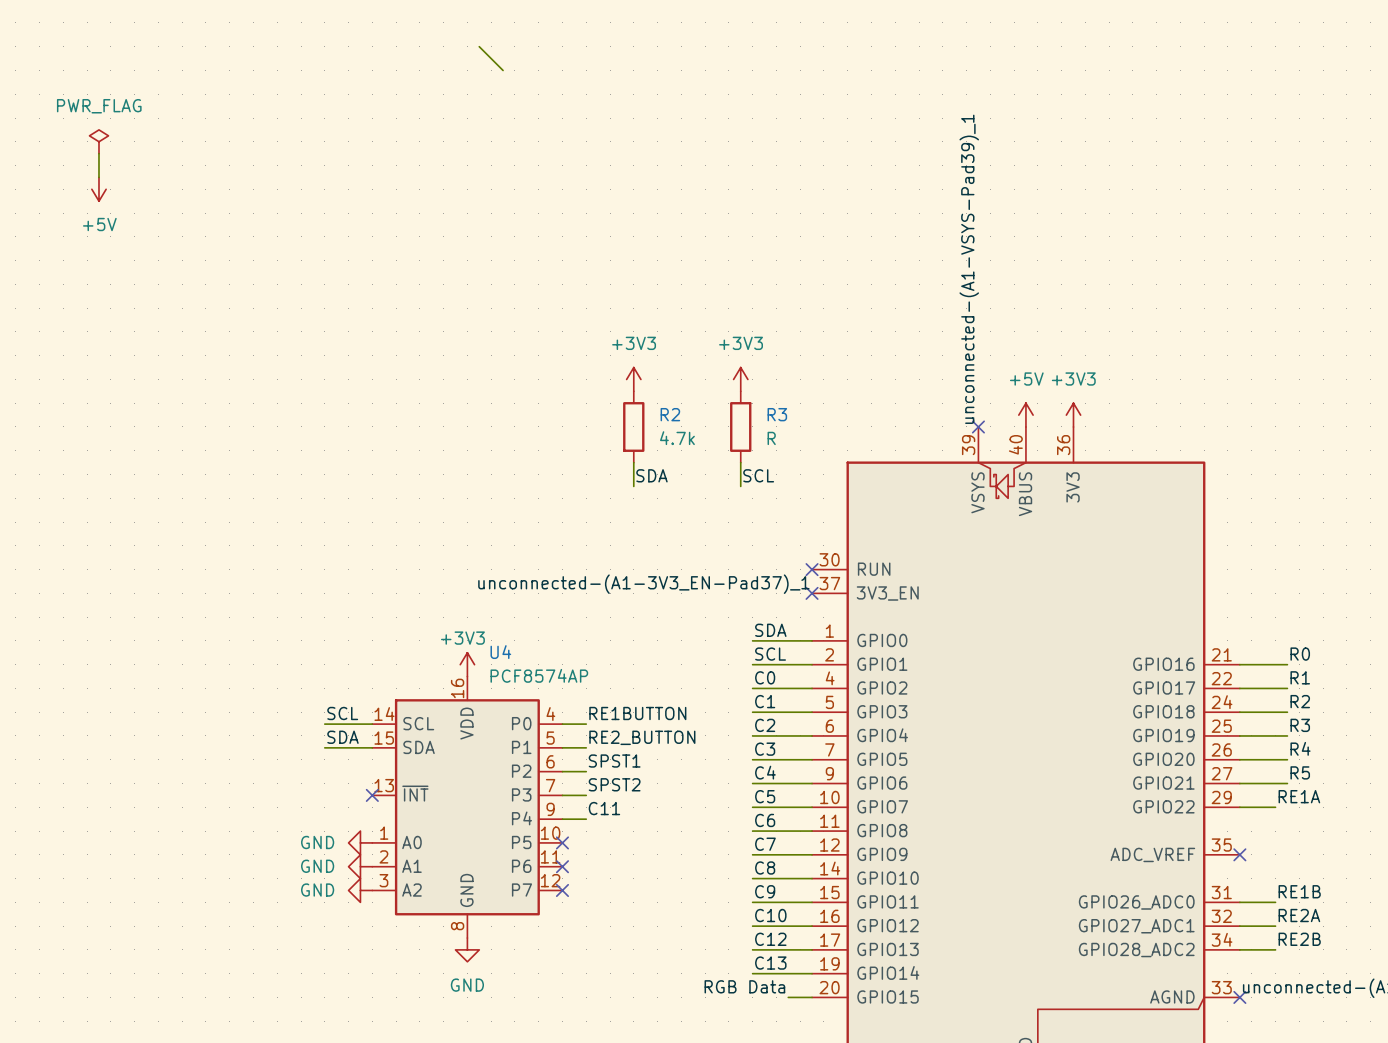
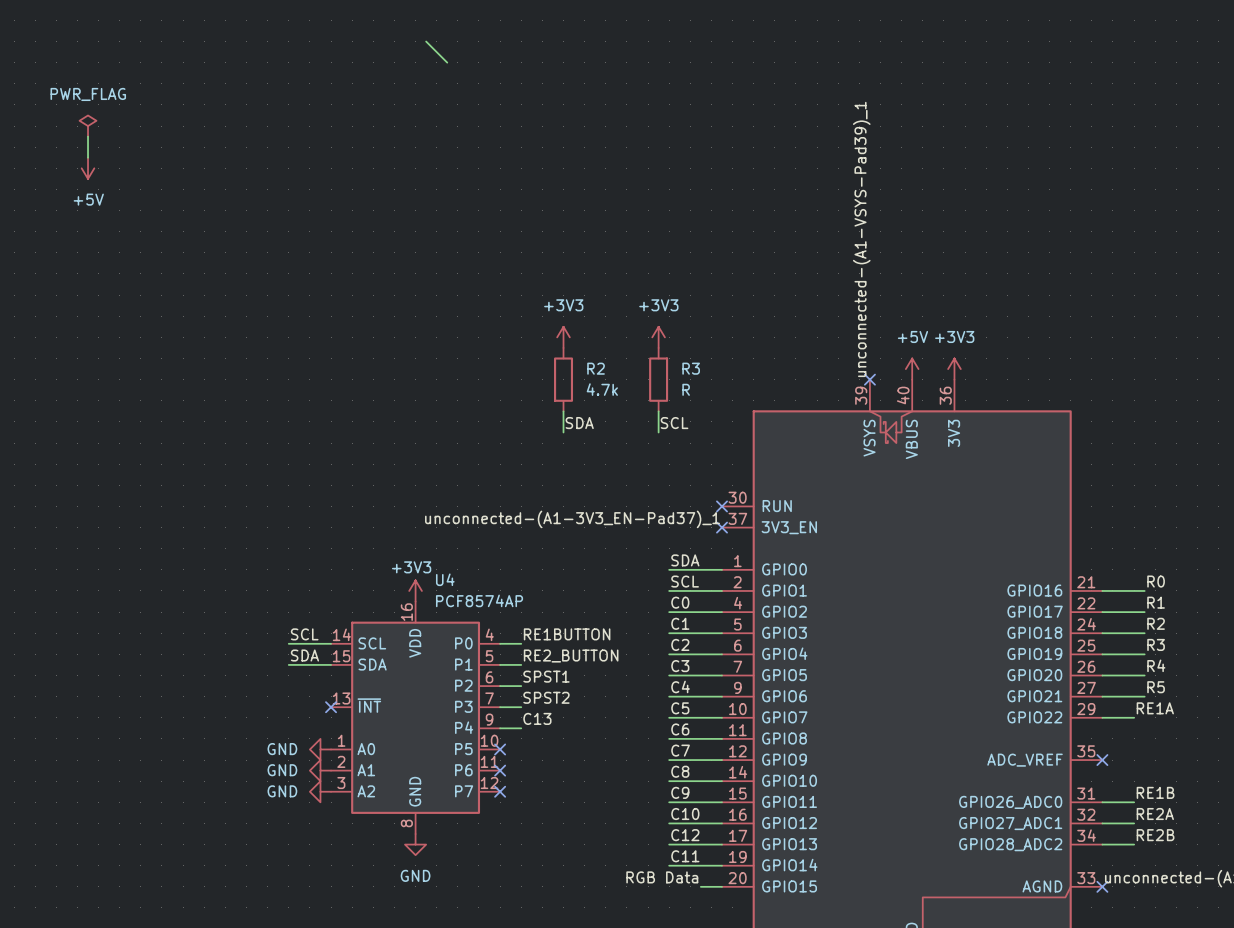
label: C11 (604, 808) -> C13 (537, 718)
label: C13 (770, 963) -> C11 (685, 856)

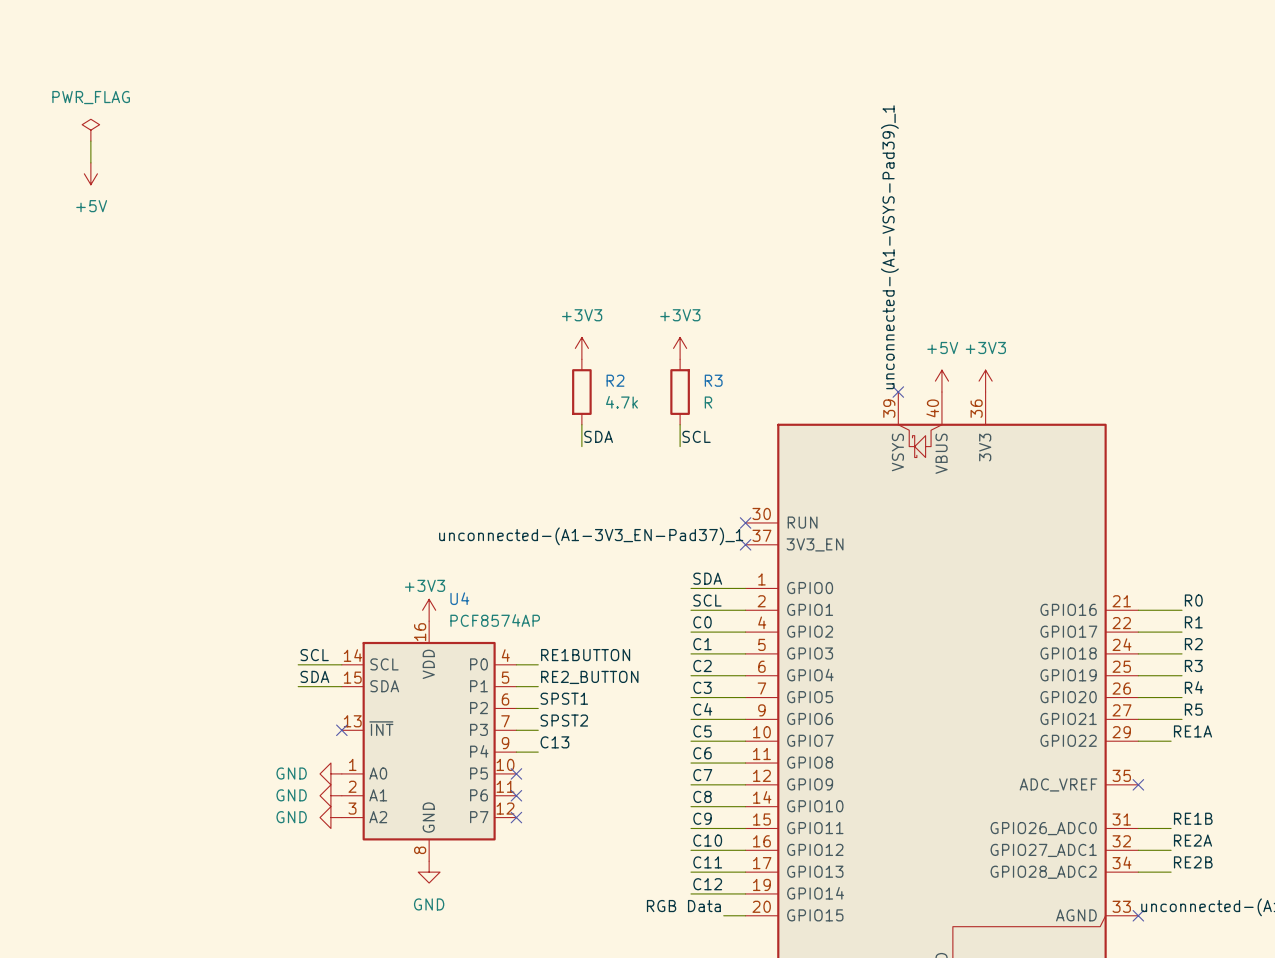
wire: (426, 41) (447, 62) -> none
label: C12 (685, 835) -> C11 (707, 862)
label: C11 (685, 856) -> C12 (707, 884)

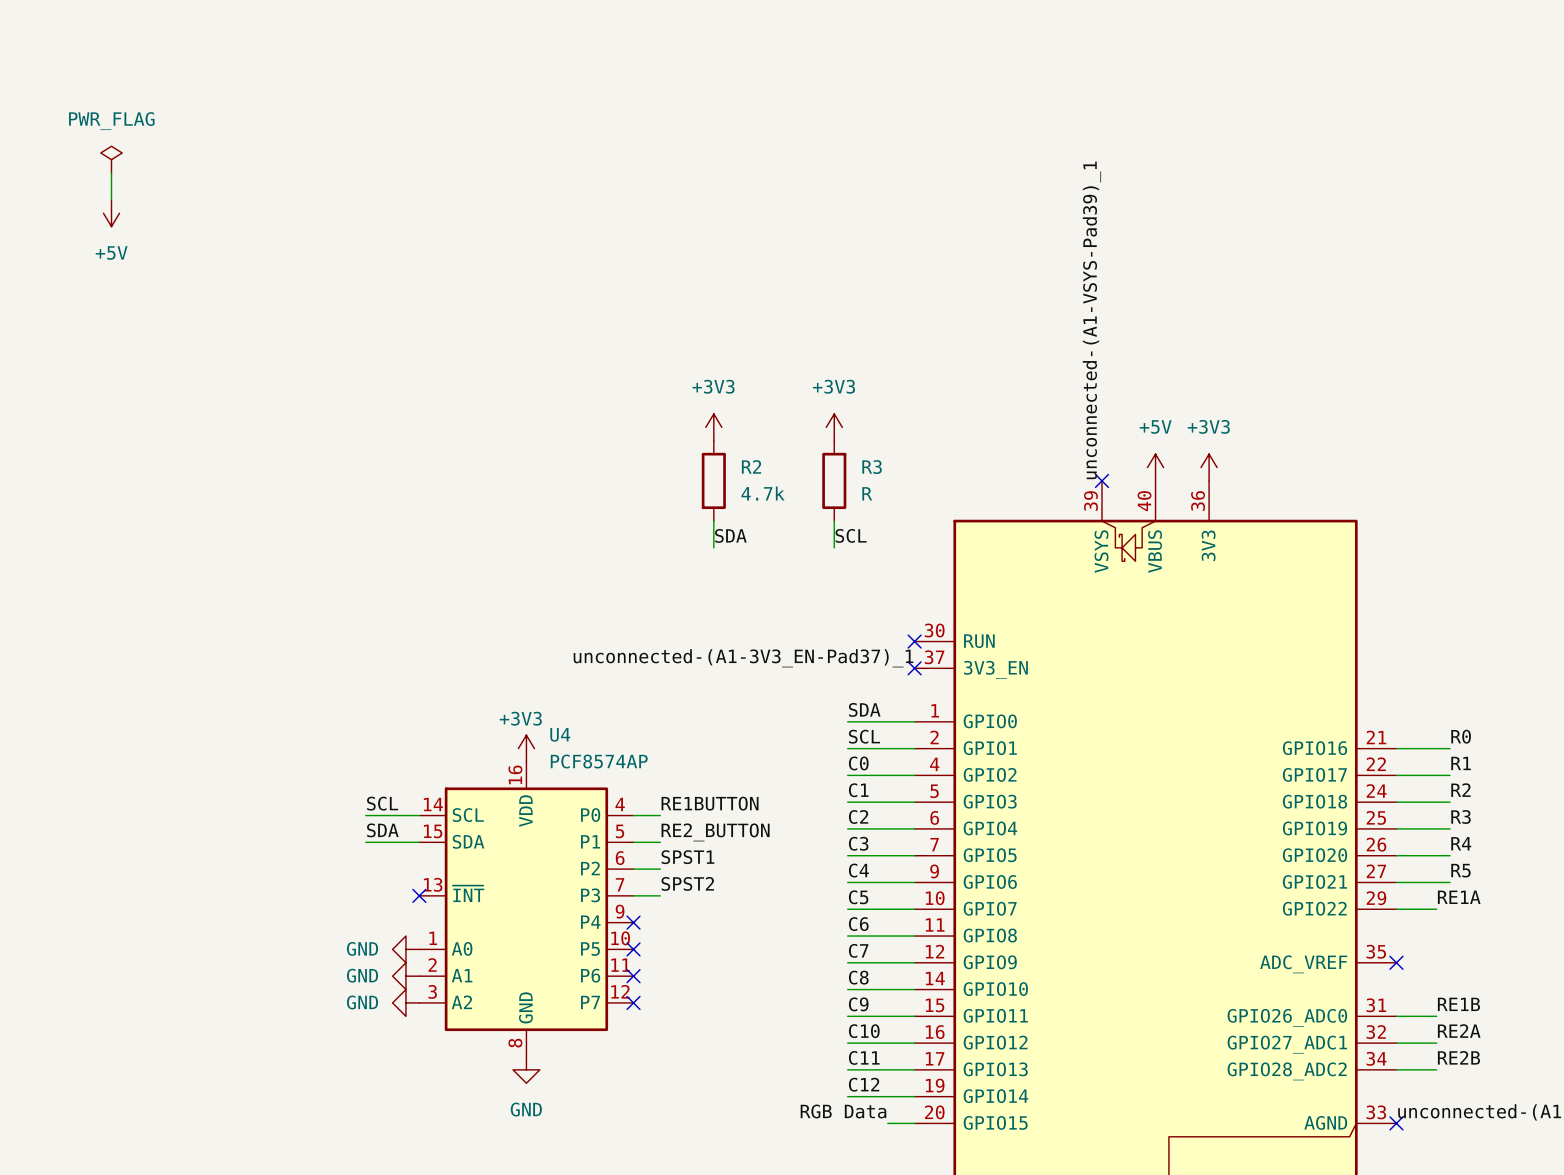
label: C13 (554, 742) -> none
wire: (516, 752) (538, 752) -> none
no-connect mark: none -> (633, 922)

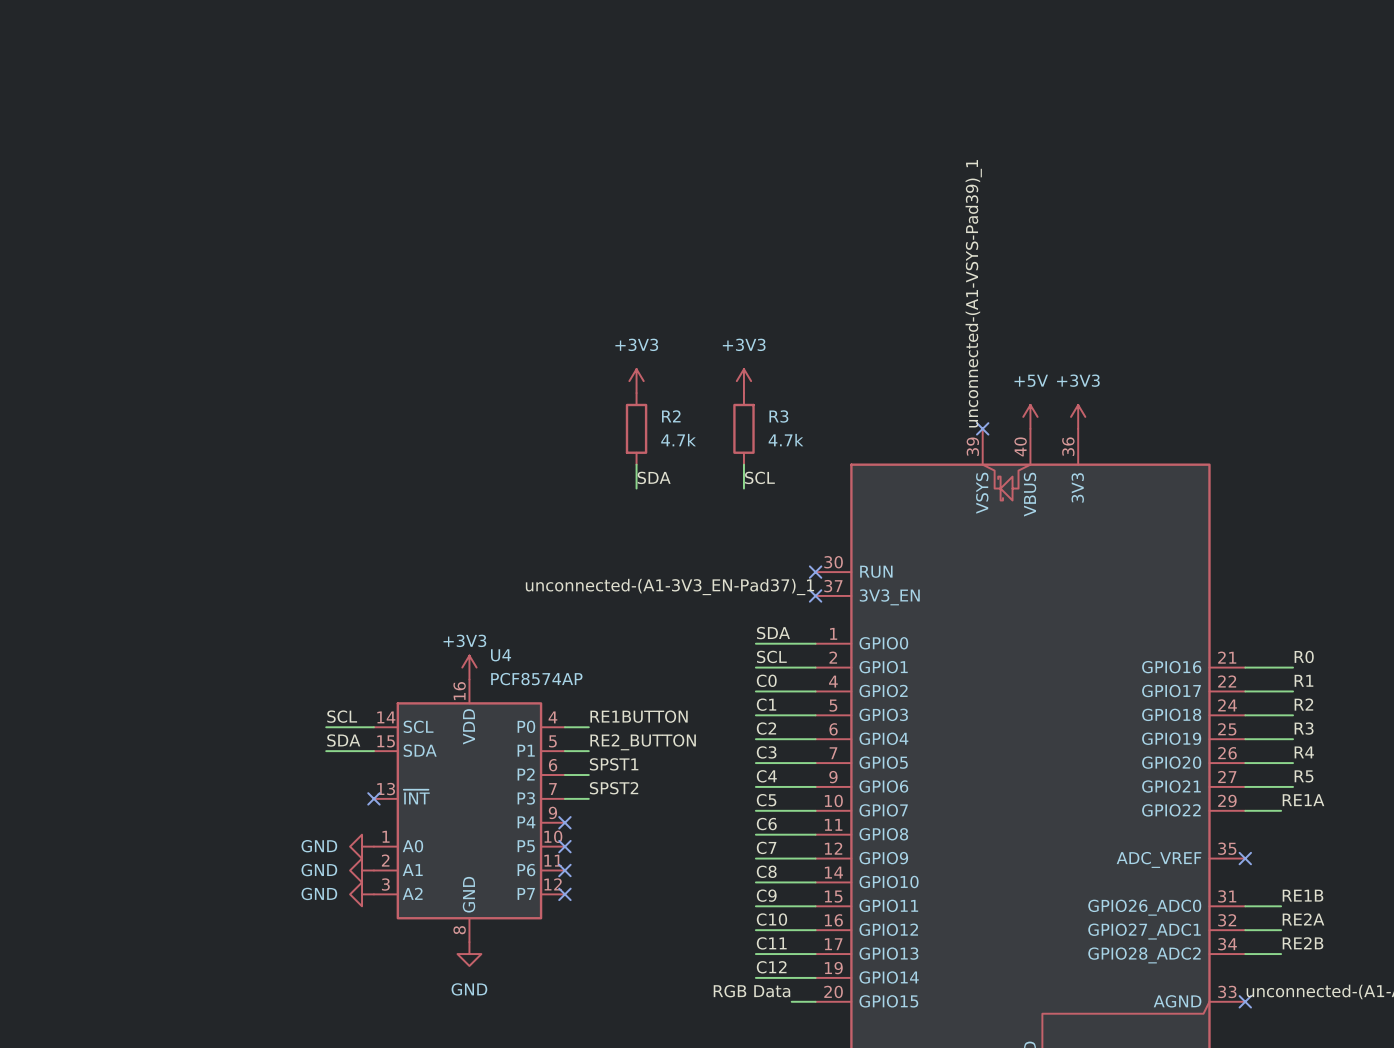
power symbol: PWR_FLAG (111, 159) -> none
wire: (111, 173) (111, 199) -> none
power symbol: +5V (111, 213) -> none
R3 value: R (867, 493) -> 4.7k (785, 440)

